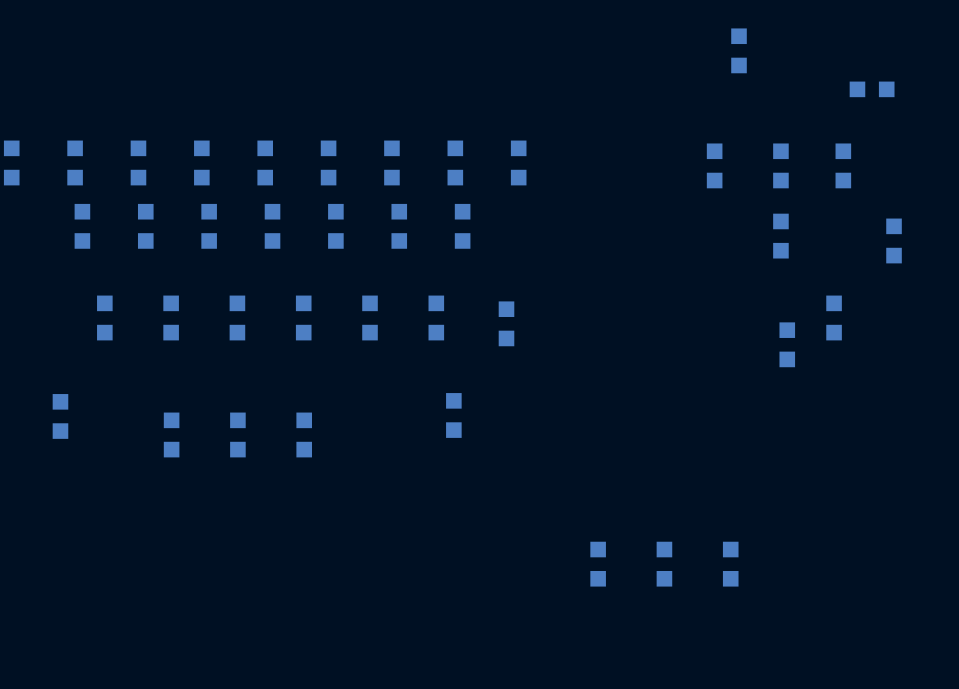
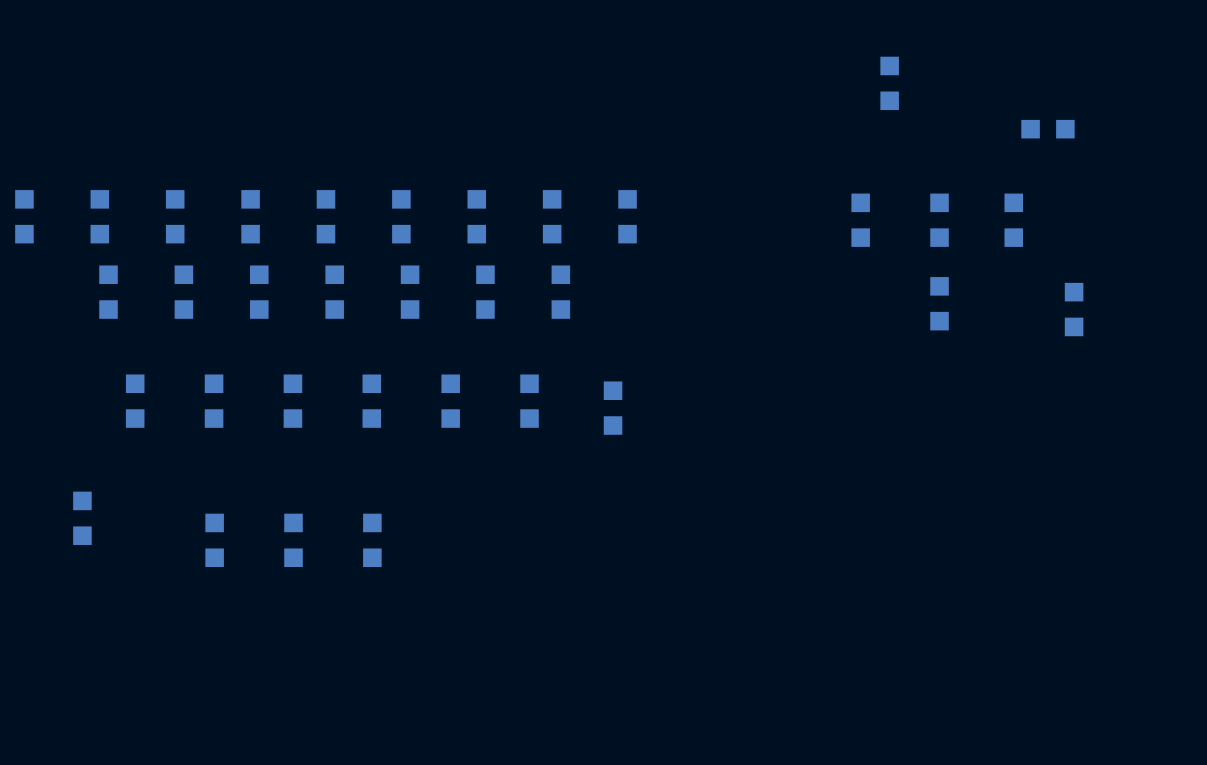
part: (834, 317) -> none
part: (787, 344) -> none
part: (453, 415) -> none
part: (598, 564) -> none
part: (664, 564) -> none
part: (730, 564) -> none

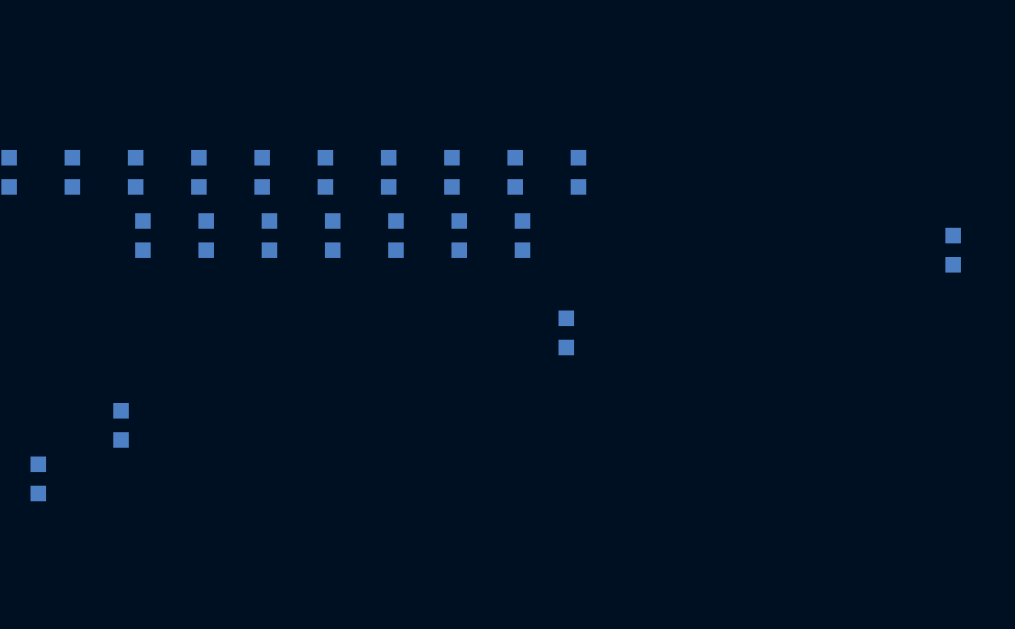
part: (889, 83) -> none
part: (1047, 129) -> none
part: (860, 220) -> none
part: (939, 220) -> none
part: (1013, 220) -> none
part: (939, 303) -> none
part: (135, 401) -> none
part: (214, 401) -> none
part: (292, 401) -> none
part: (371, 401) -> none
part: (450, 401) -> none
part: (529, 401) -> none
part: (214, 540) -> none
part: (293, 540) -> none
part: (372, 540) -> none

